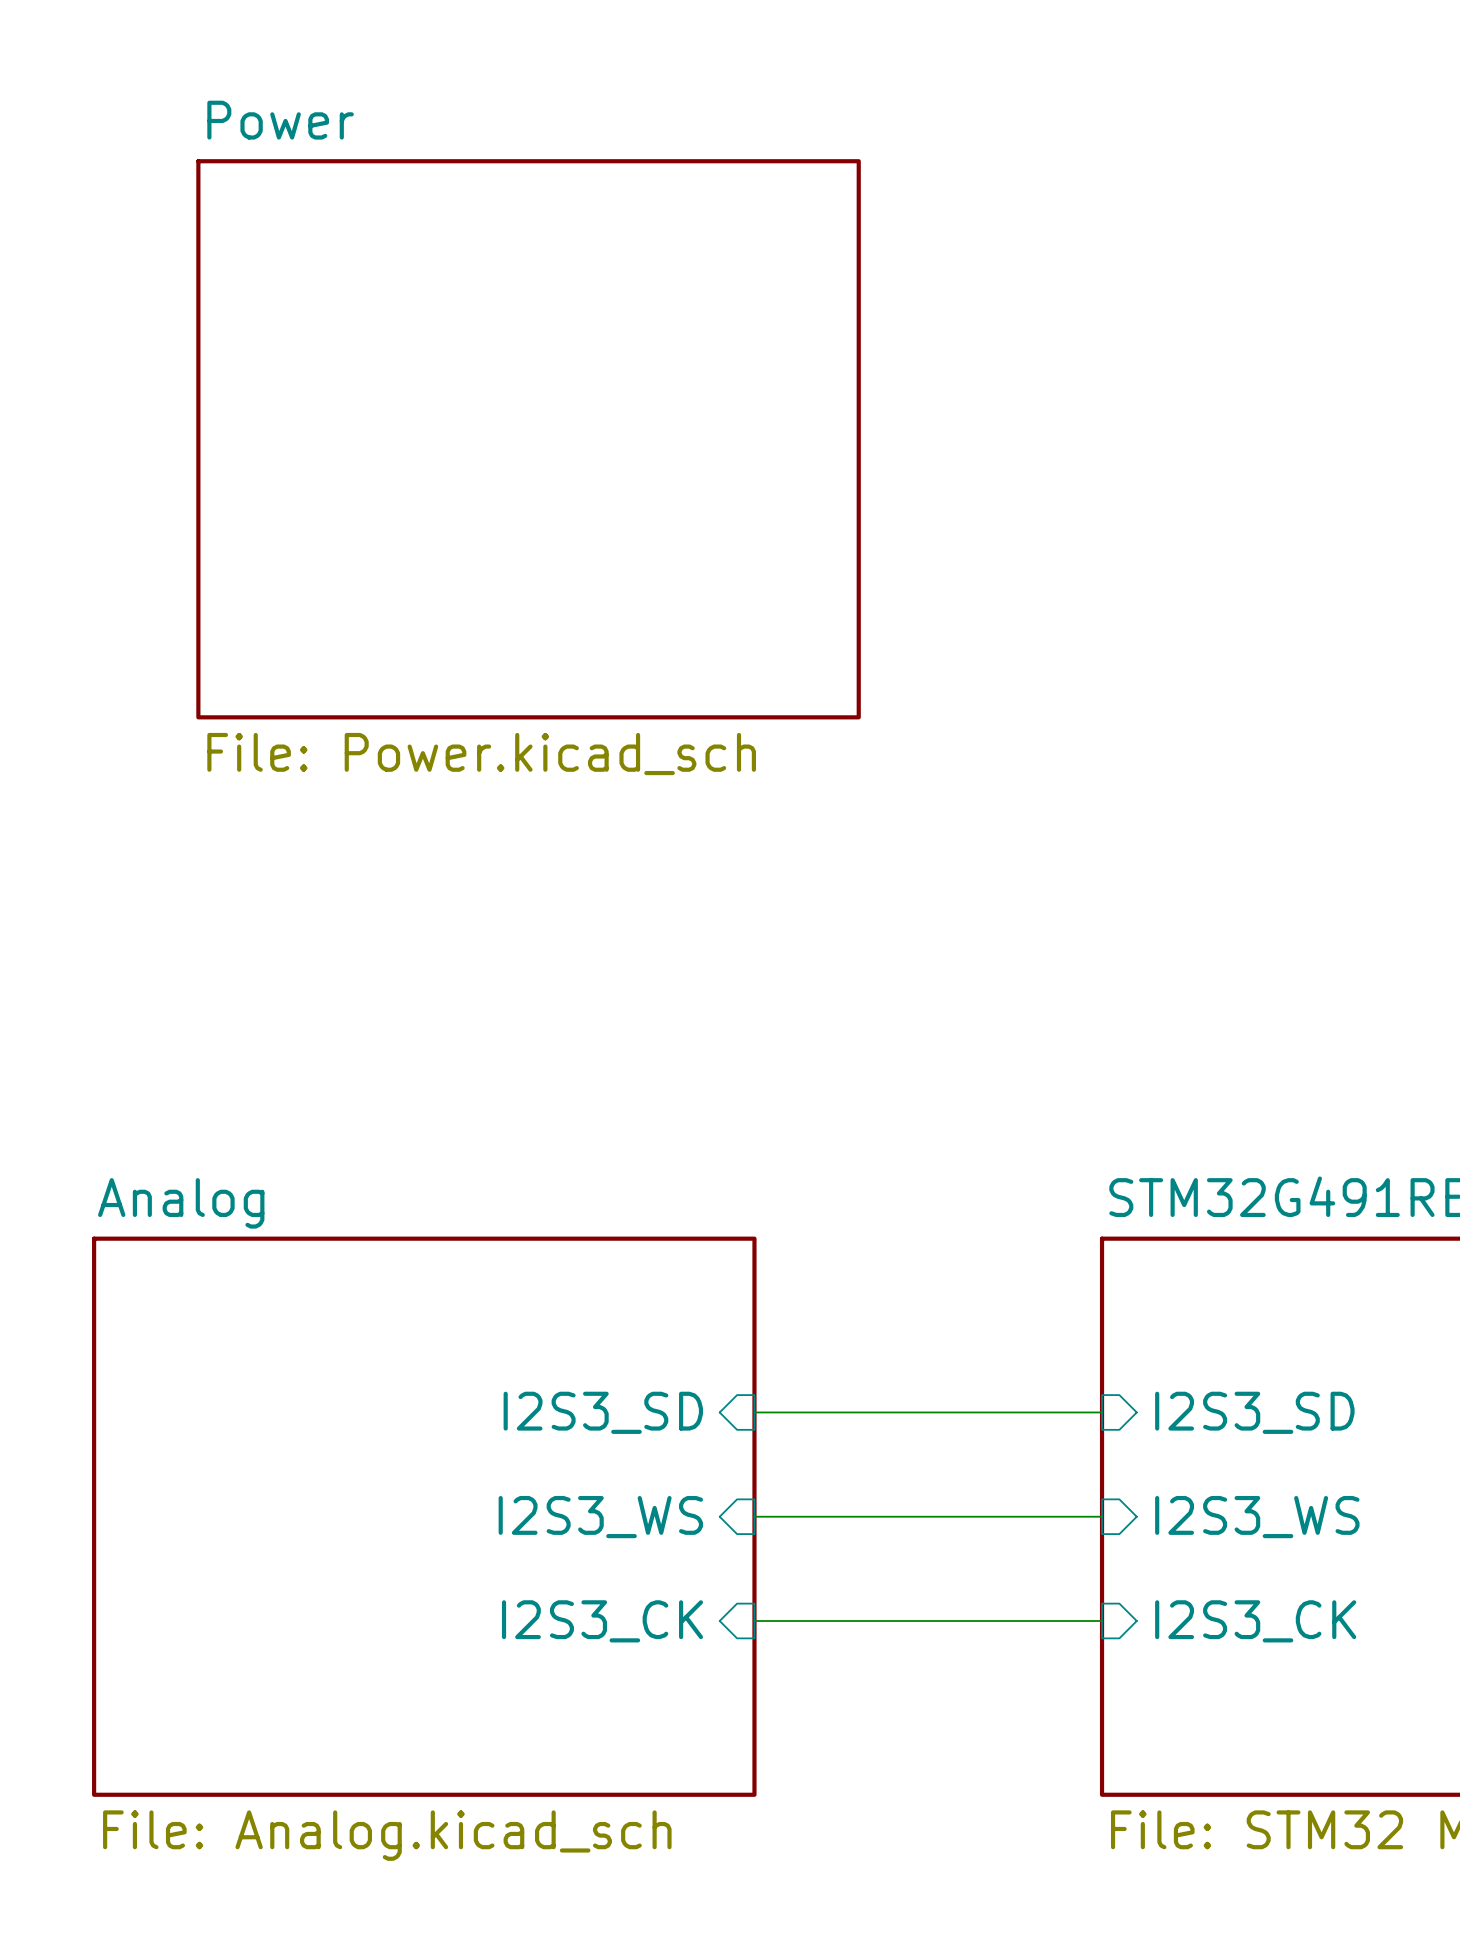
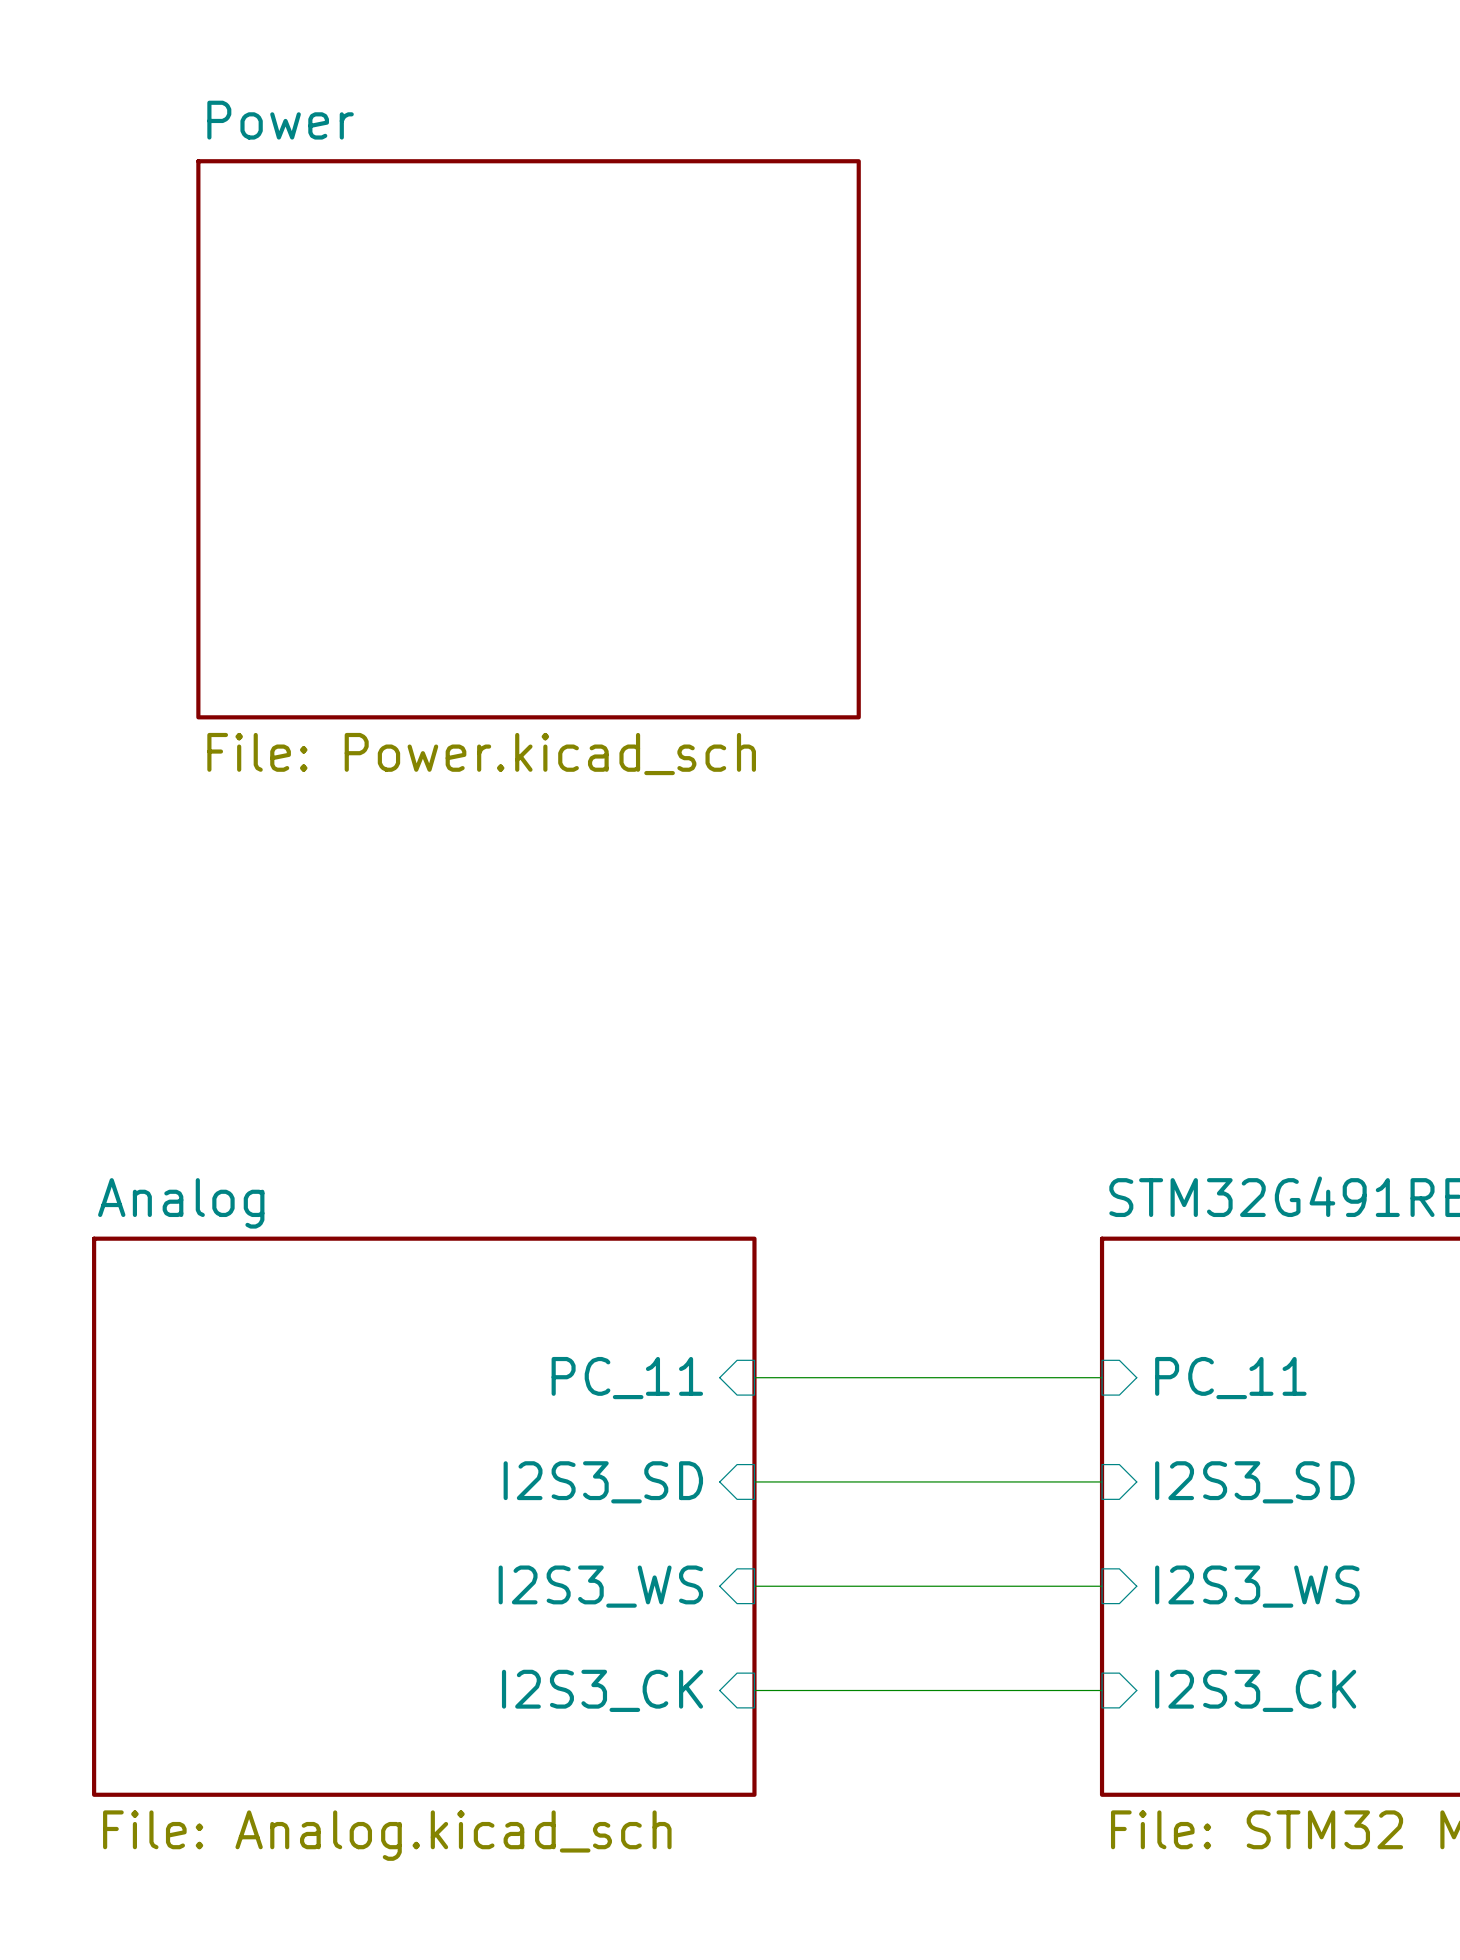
sheet pin: none -> PC_11 (627, 1378)
sheet pin: none -> PC_11 (1230, 1378)
sheet pin position: I2S3_SD (603, 1412) -> I2S3_SD (603, 1482)
wire: (754, 1412) (1102, 1412) -> (754, 1377) (1102, 1377)
sheet pin position: I2S3_SD (1254, 1412) -> I2S3_SD (1254, 1482)
wire: (754, 1516) (1102, 1516) -> (754, 1481) (1102, 1481)
sheet pin position: I2S3_WS (600, 1517) -> I2S3_WS (600, 1586)
sheet pin position: I2S3_WS (1257, 1517) -> I2S3_WS (1257, 1586)
wire: (754, 1620) (1102, 1620) -> (754, 1586) (1102, 1586)
sheet pin position: I2S3_CK (602, 1621) -> I2S3_CK (602, 1690)
sheet pin position: I2S3_CK (1255, 1621) -> I2S3_CK (1255, 1690)
wire: none -> (754, 1690) (1102, 1690)

